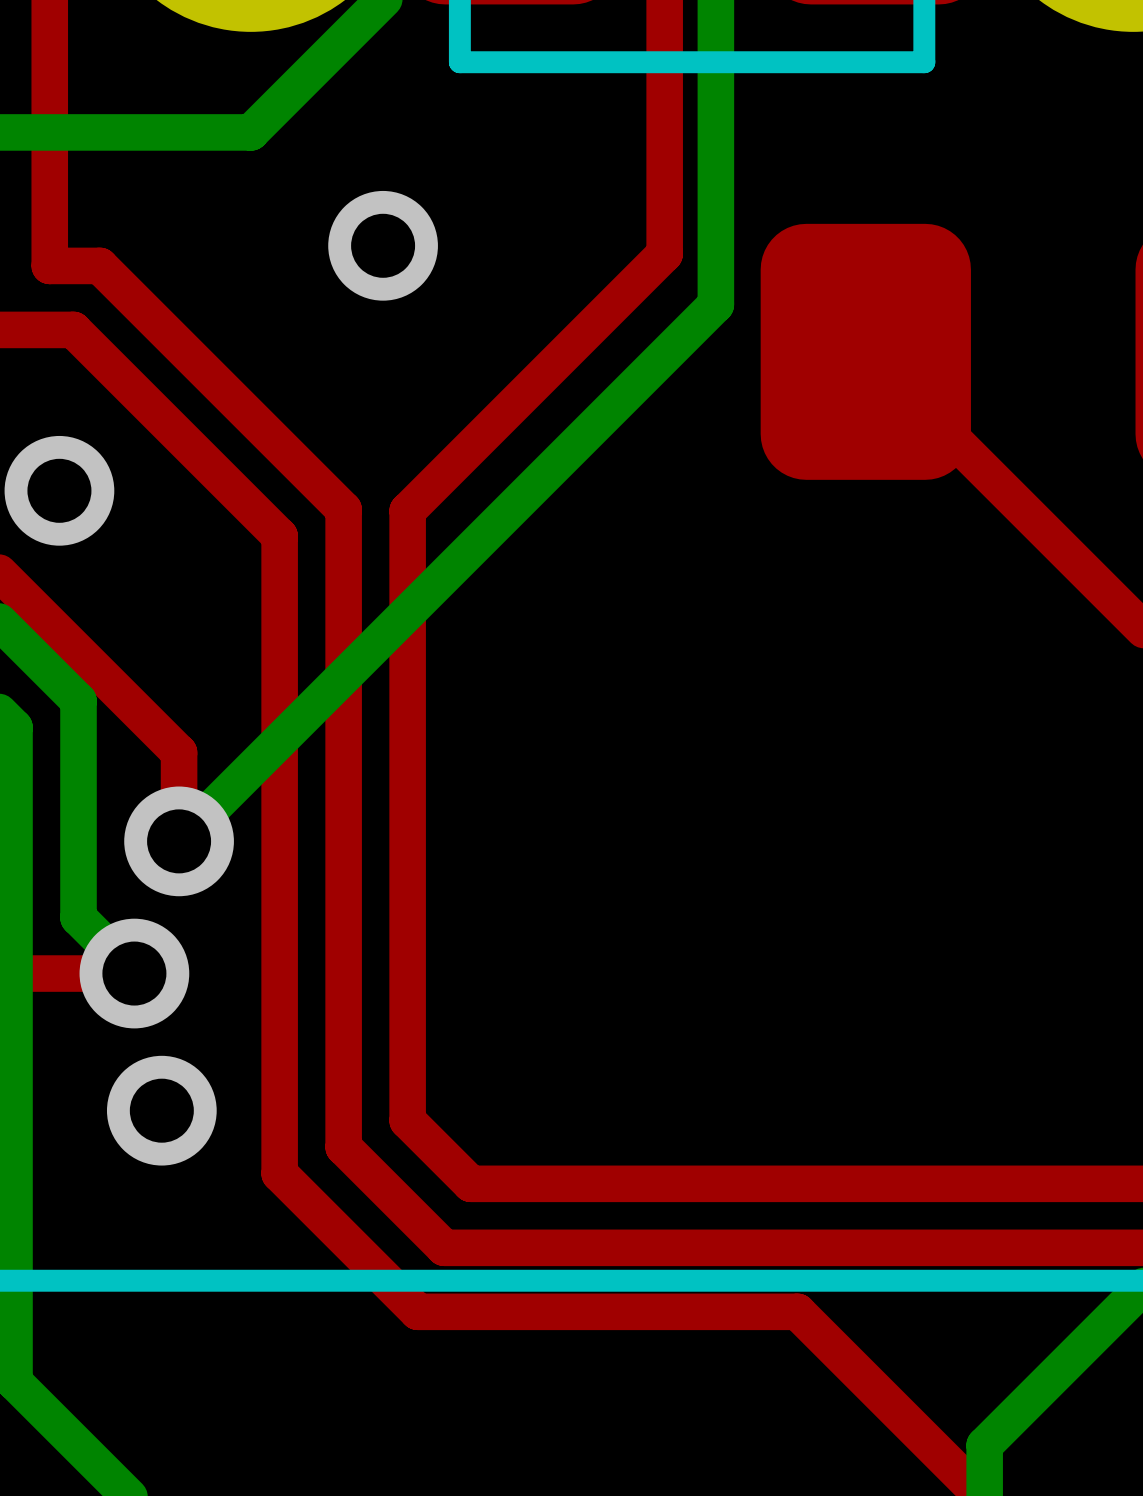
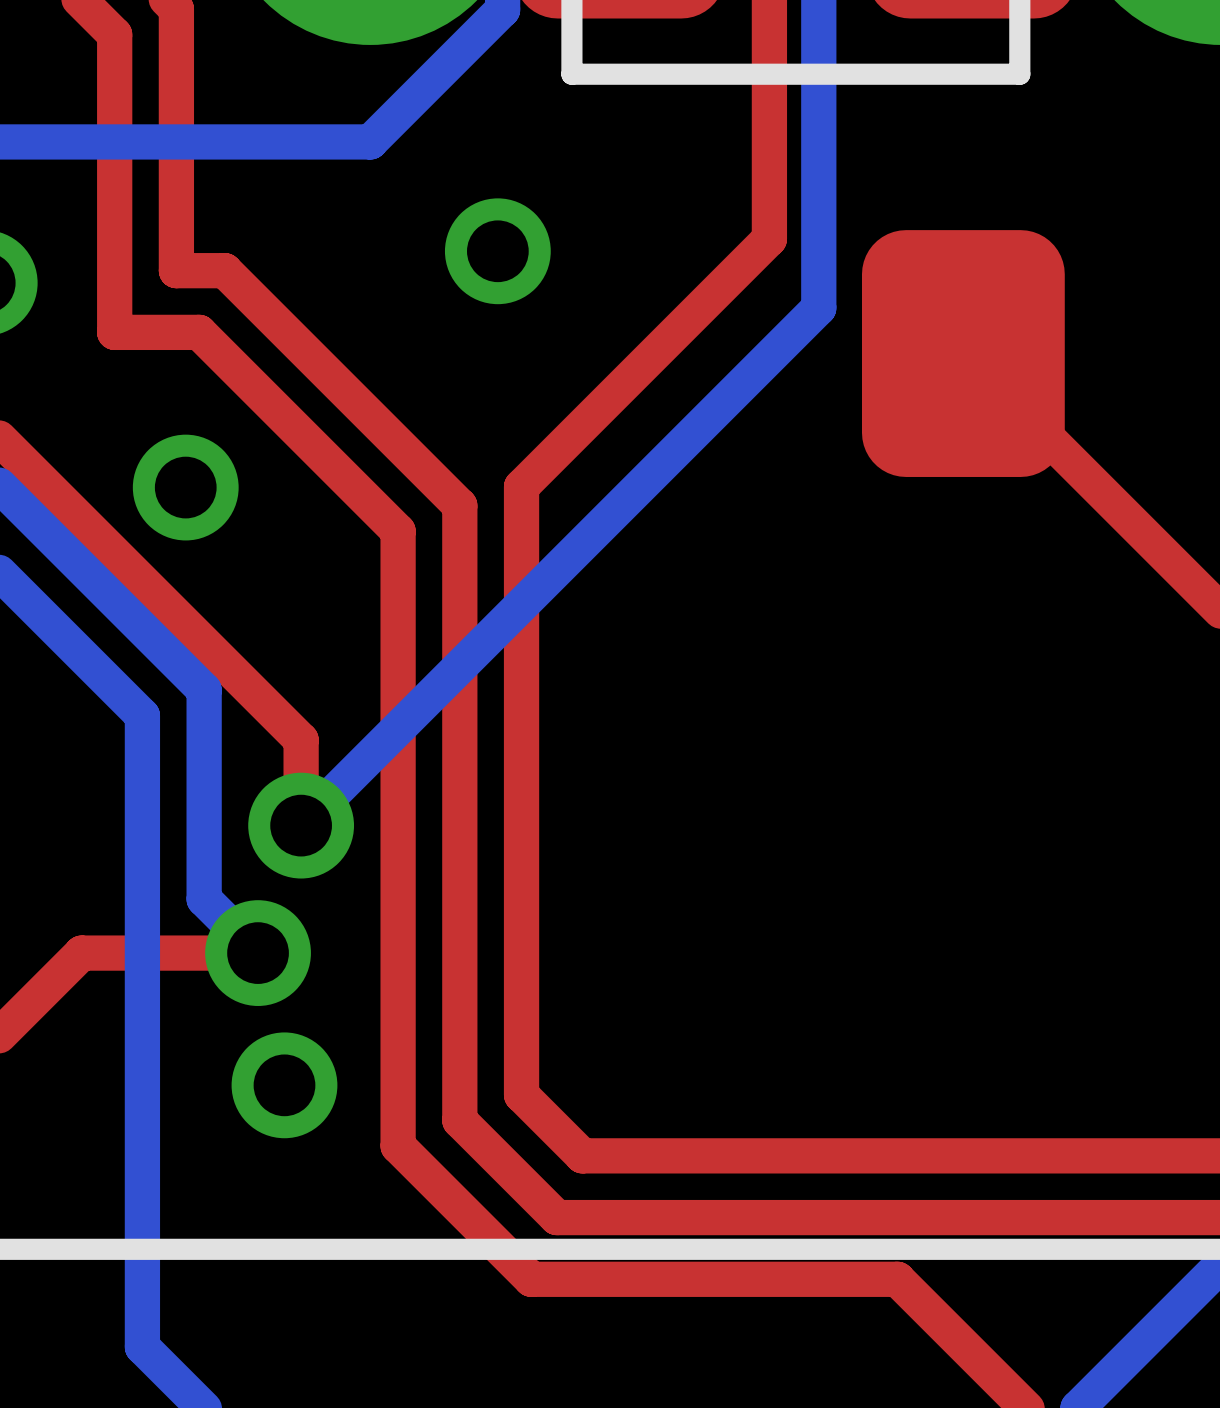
top track: (664, 233) (664, 253) (407, 510) -> (769, 238) (521, 486) (521, 506)

